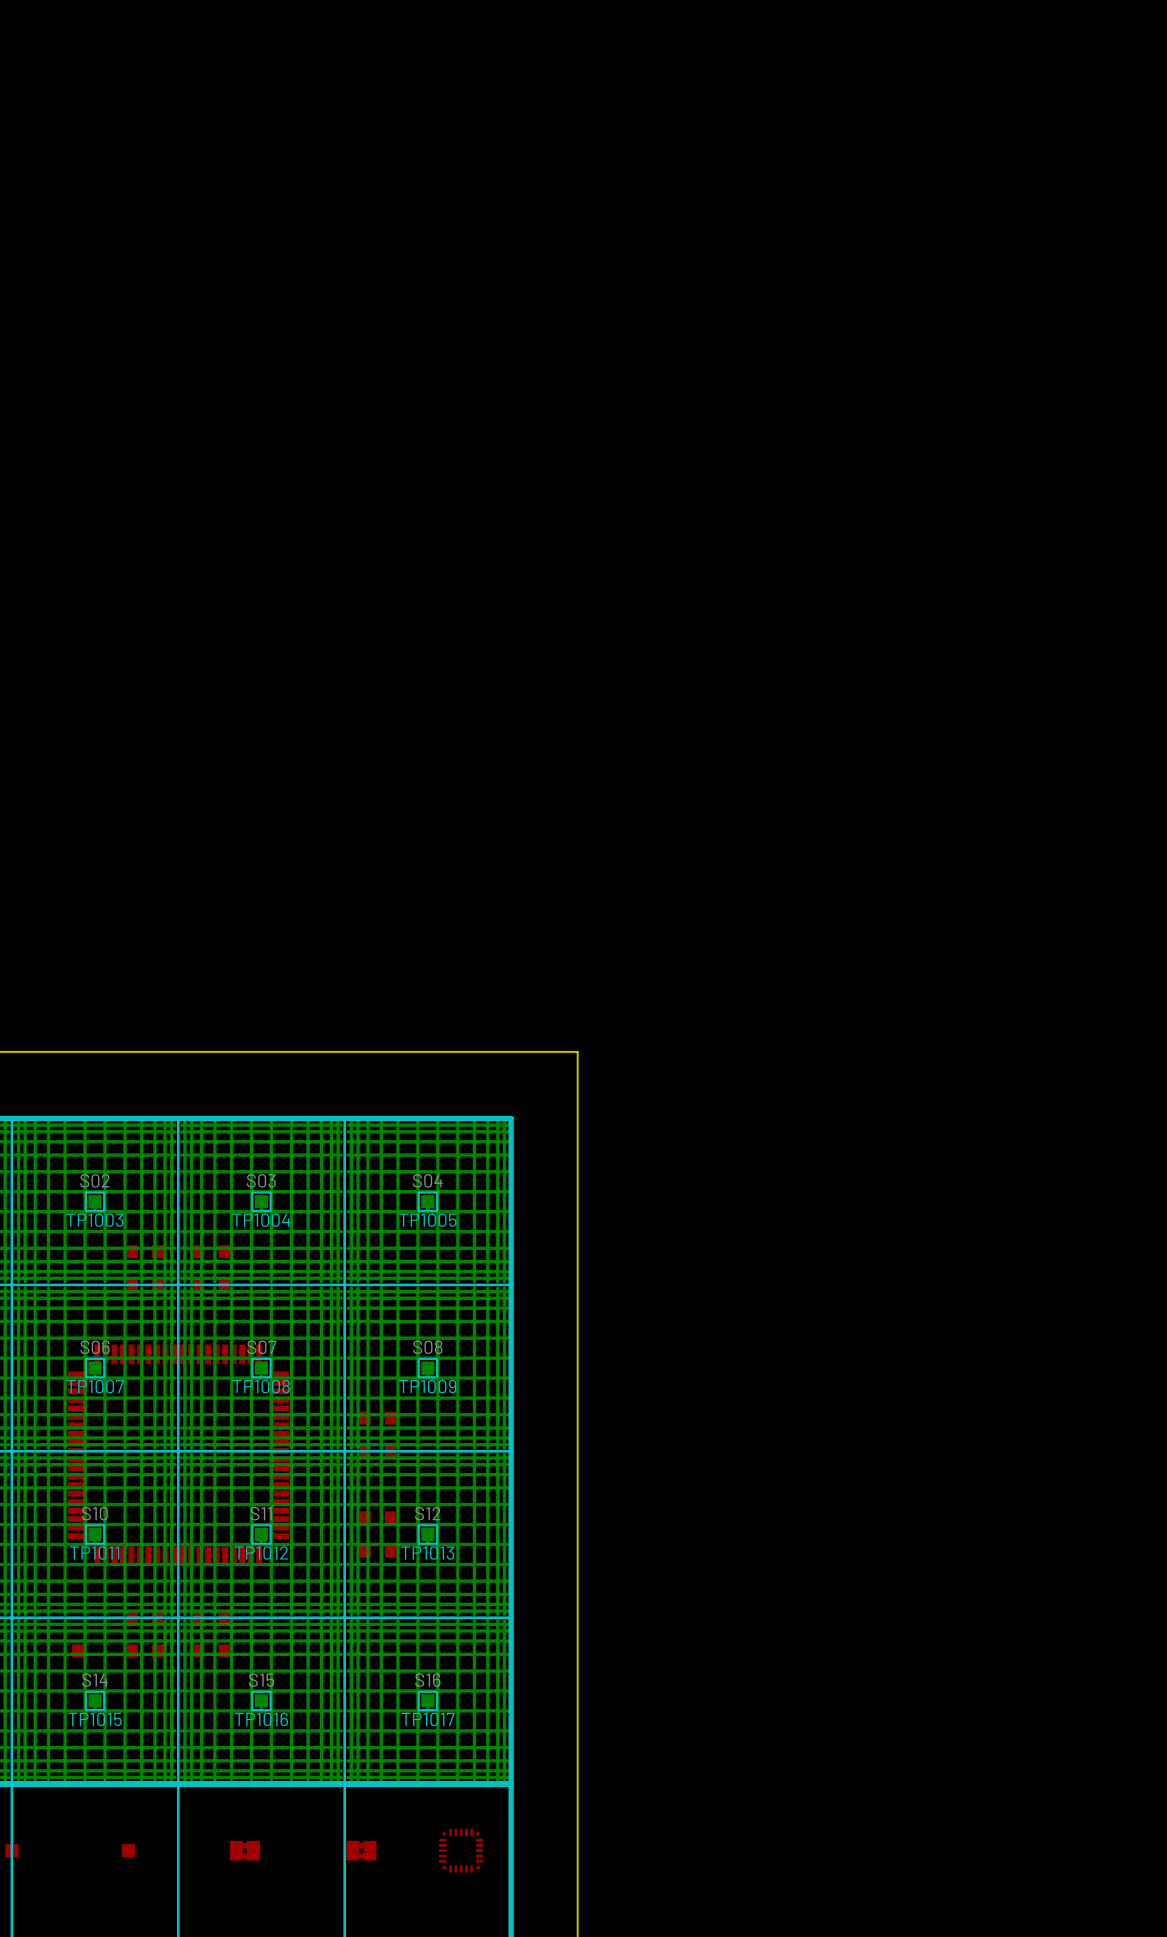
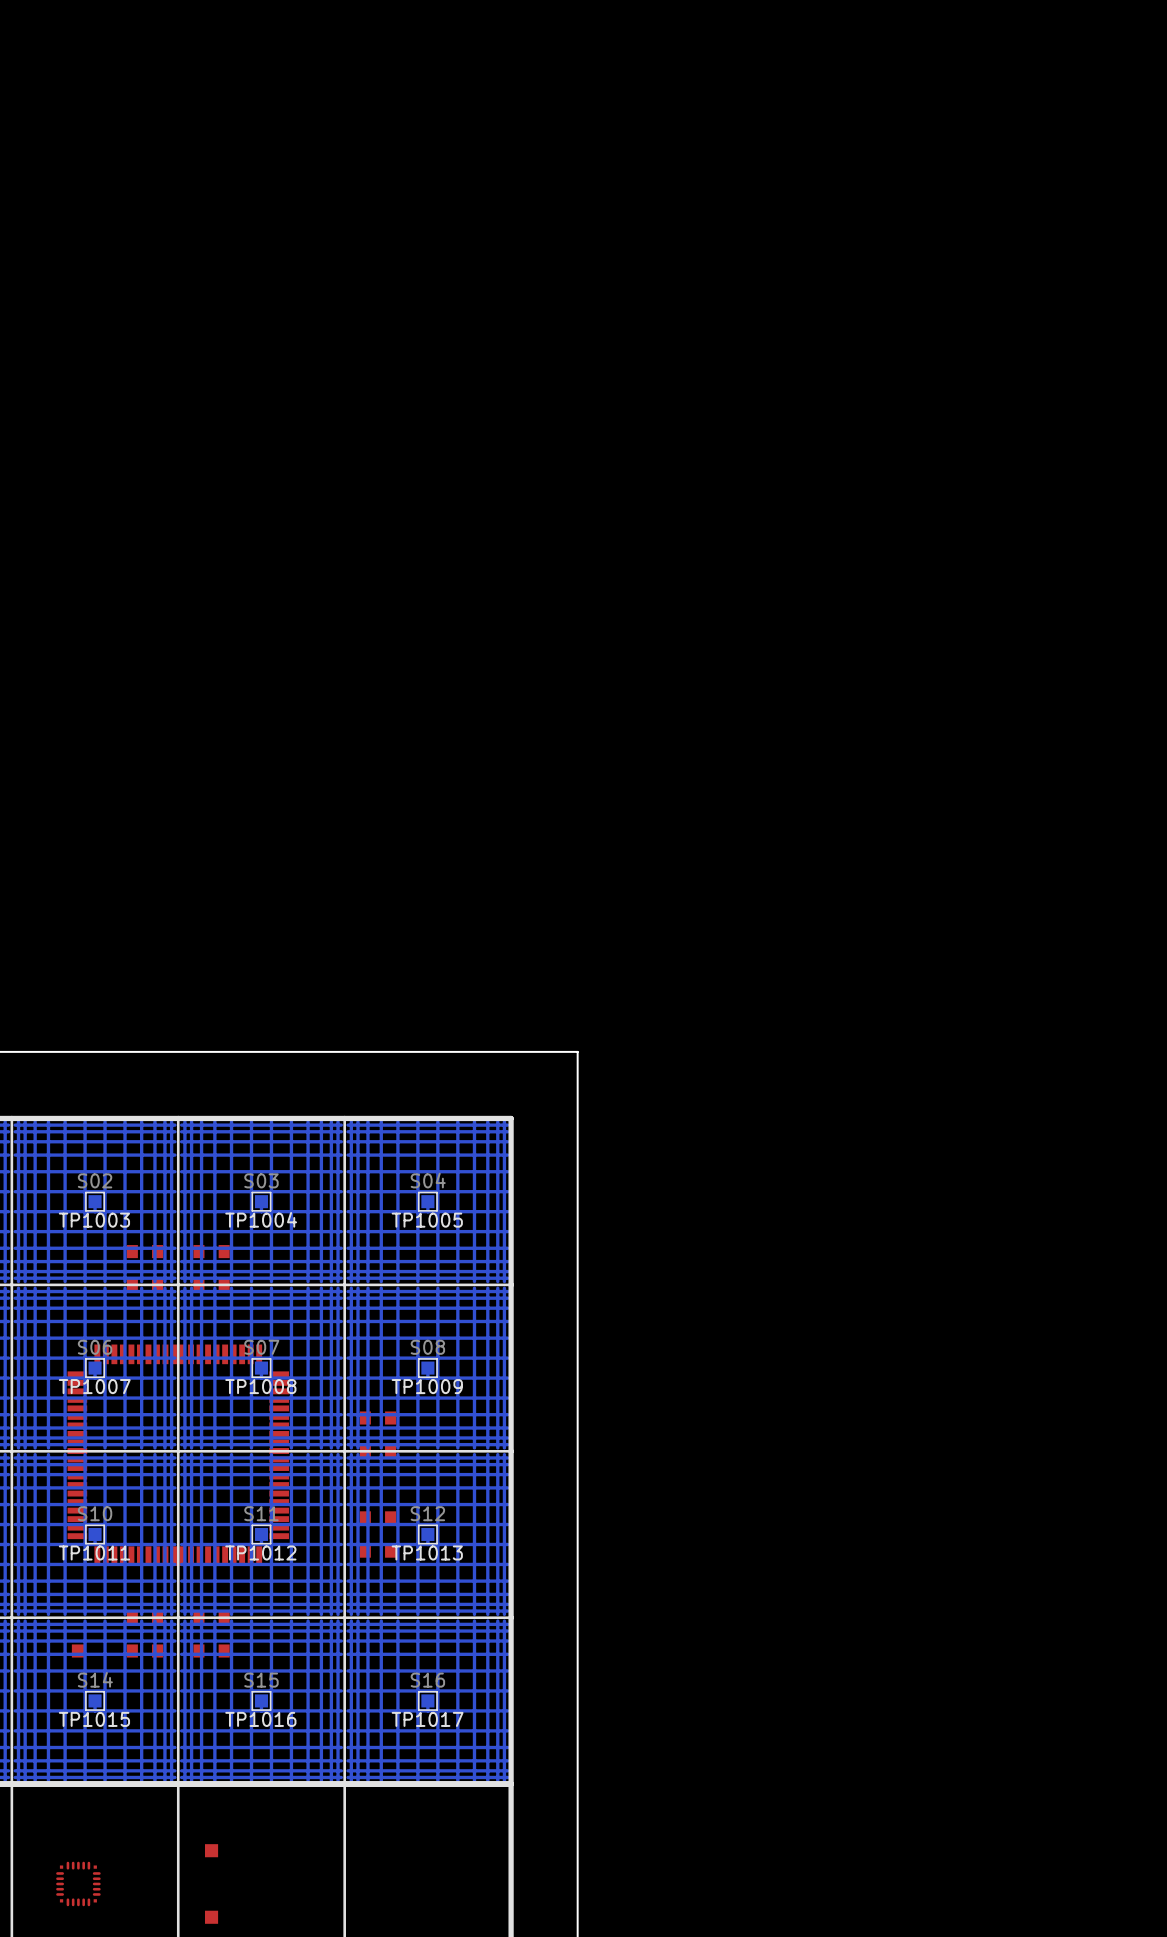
part: (11, 1850) -> none
part: (128, 1850) -> none
part: none -> (211, 1850)
part: (244, 1850) -> none
part: (361, 1850) -> none
part: (461, 1850) -> none
part: none -> (78, 1883)
part: none -> (211, 1917)

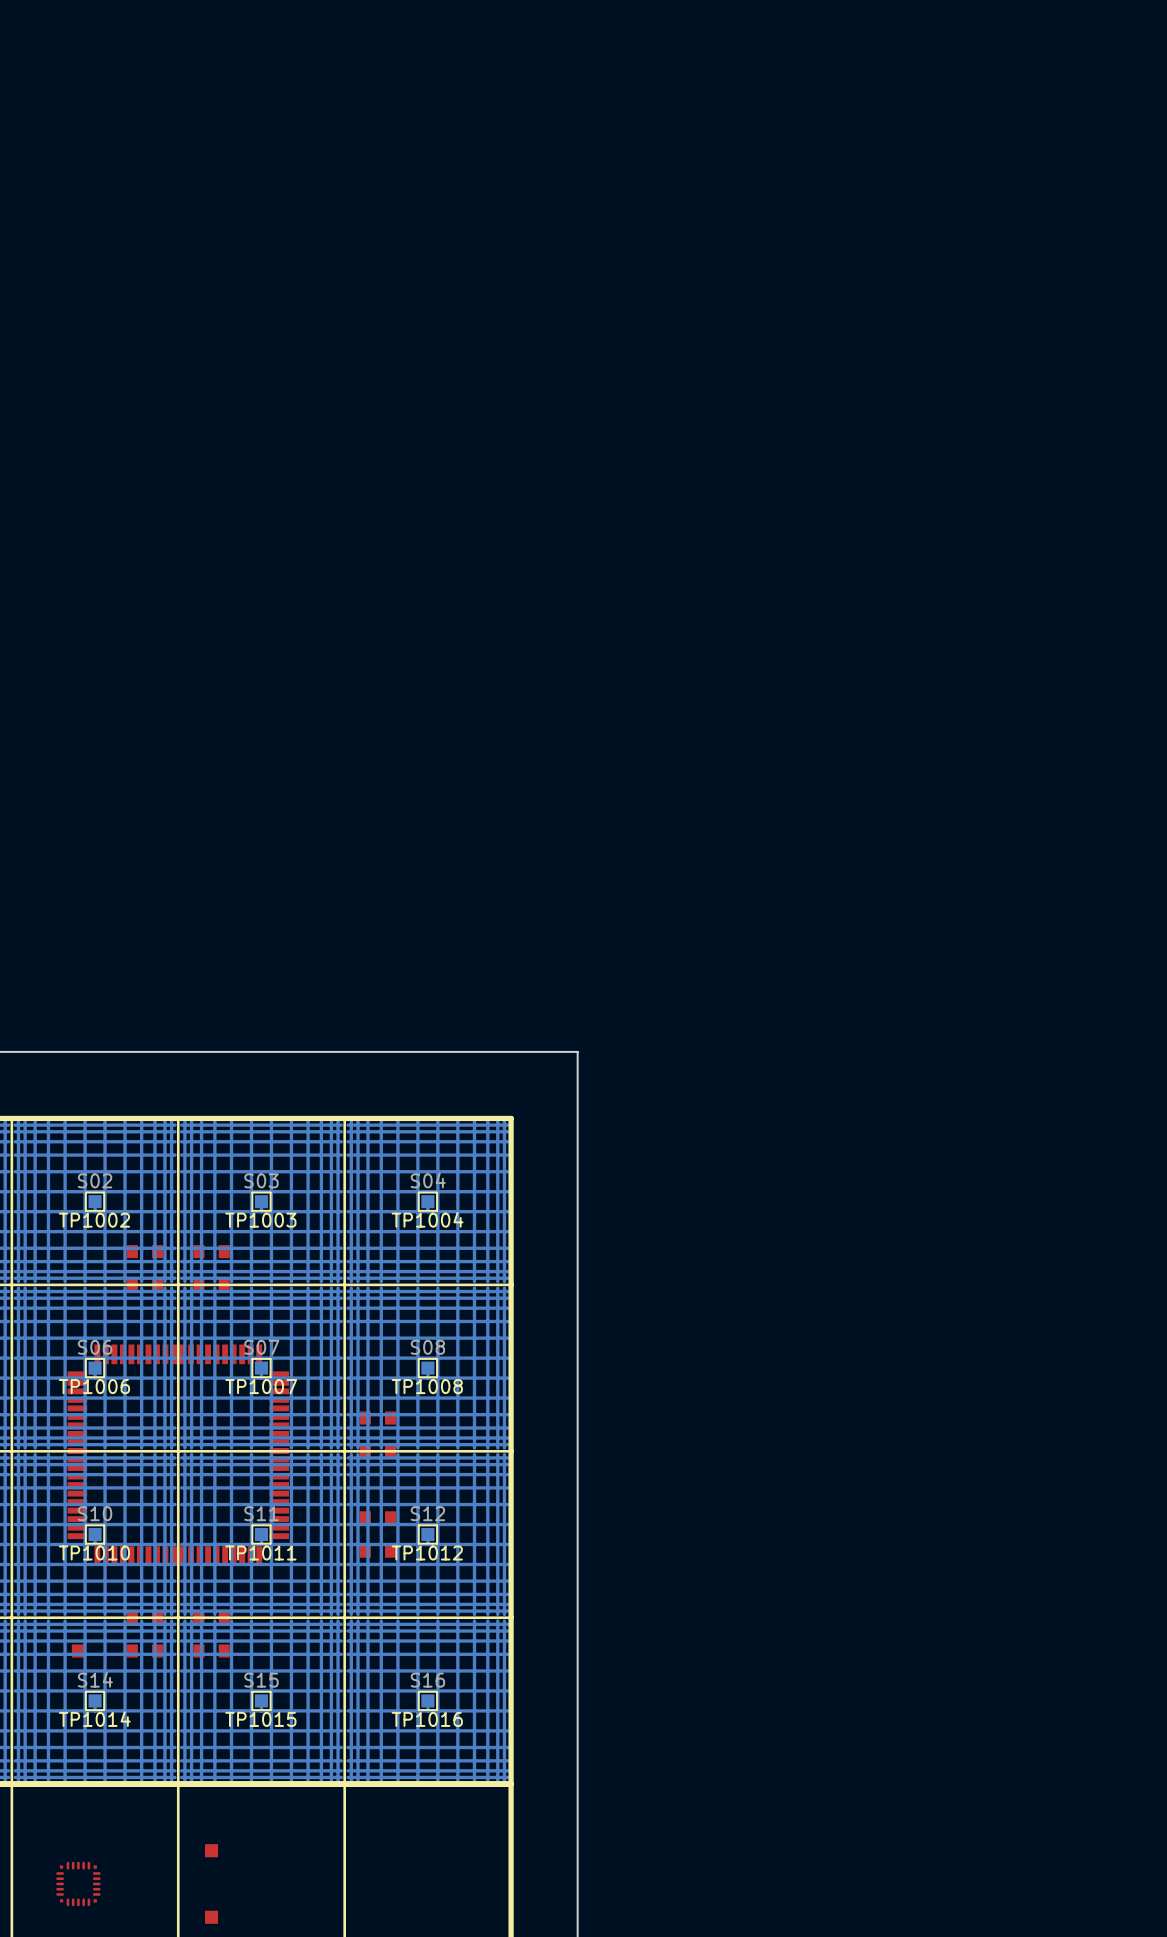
TP1004 name: TP1004 (261, 1219) -> TP1003 (260, 1220)
TP1003 name: TP1003 (94, 1220) -> TP1002 (94, 1220)
TP1005 name: TP1005 (427, 1220) -> TP1004 (427, 1219)
TP1007 name: TP1007 (94, 1386) -> TP1006 (94, 1386)
TP1008 name: TP1008 (260, 1386) -> TP1007 (261, 1386)
TP1009 name: TP1009 (427, 1386) -> TP1008 (427, 1386)
TP1011 name: TP1011 (94, 1552) -> TP1010 (94, 1552)
TP1012 name: TP1012 (260, 1552) -> TP1011 (260, 1552)
TP1013 name: TP1013 (427, 1552) -> TP1012 (427, 1552)
TP1015 name: TP1015 (94, 1719) -> TP1014 (94, 1719)
TP1016 name: TP1016 (260, 1719) -> TP1015 (260, 1719)
TP1017 name: TP1017 (427, 1719) -> TP1016 (427, 1719)

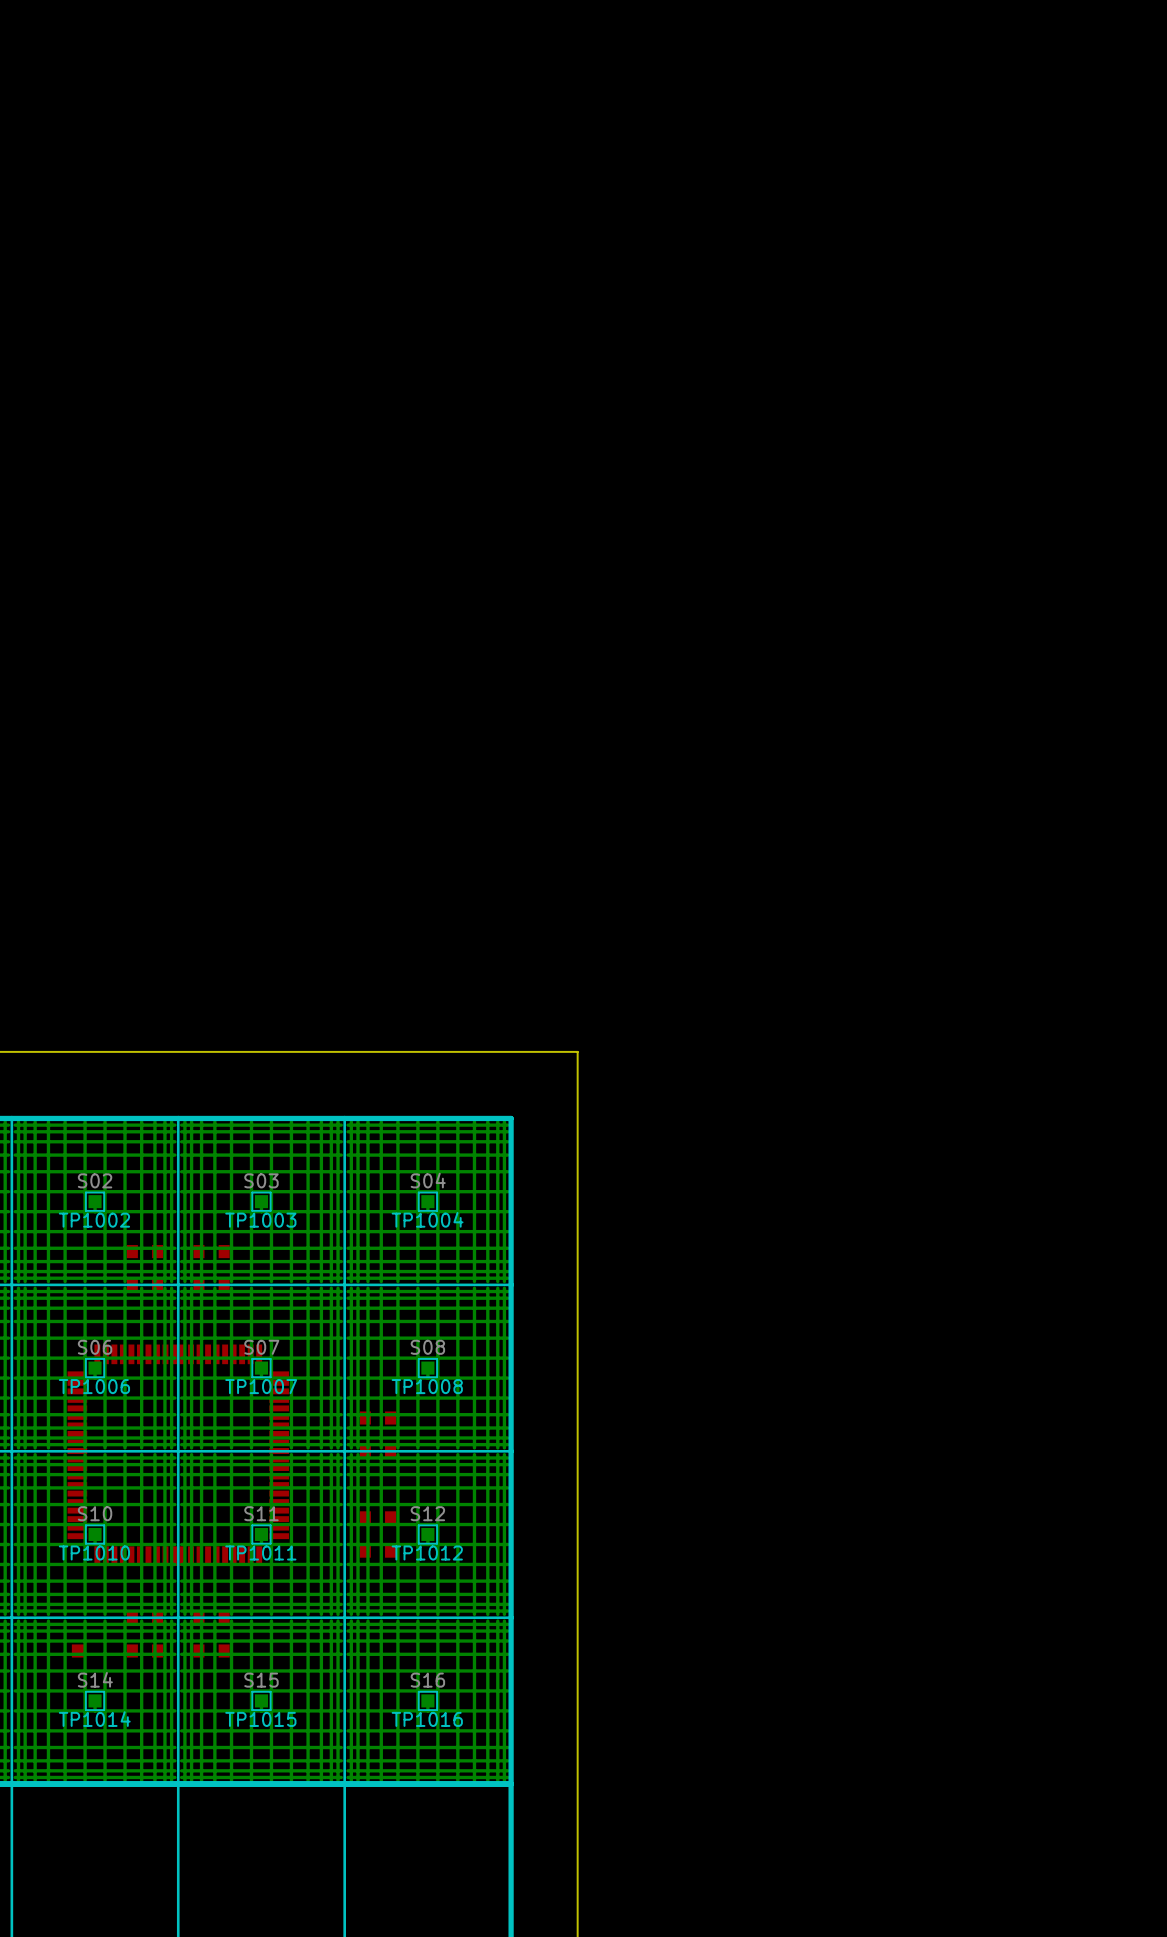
part: (211, 1850) -> none
part: (78, 1883) -> none
part: (211, 1917) -> none

